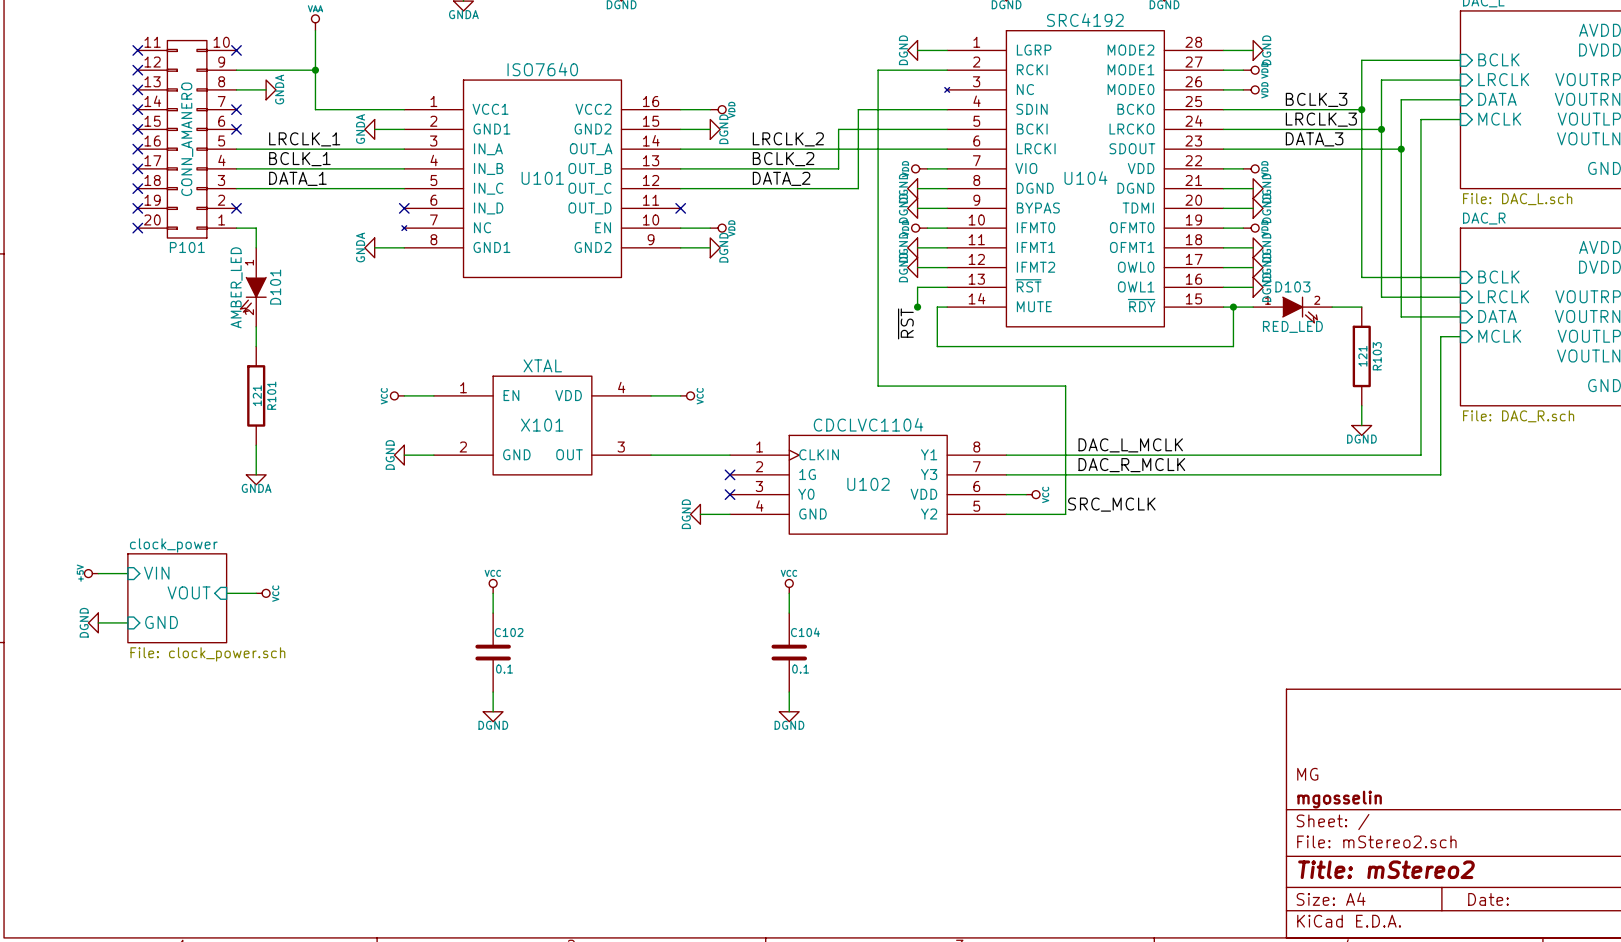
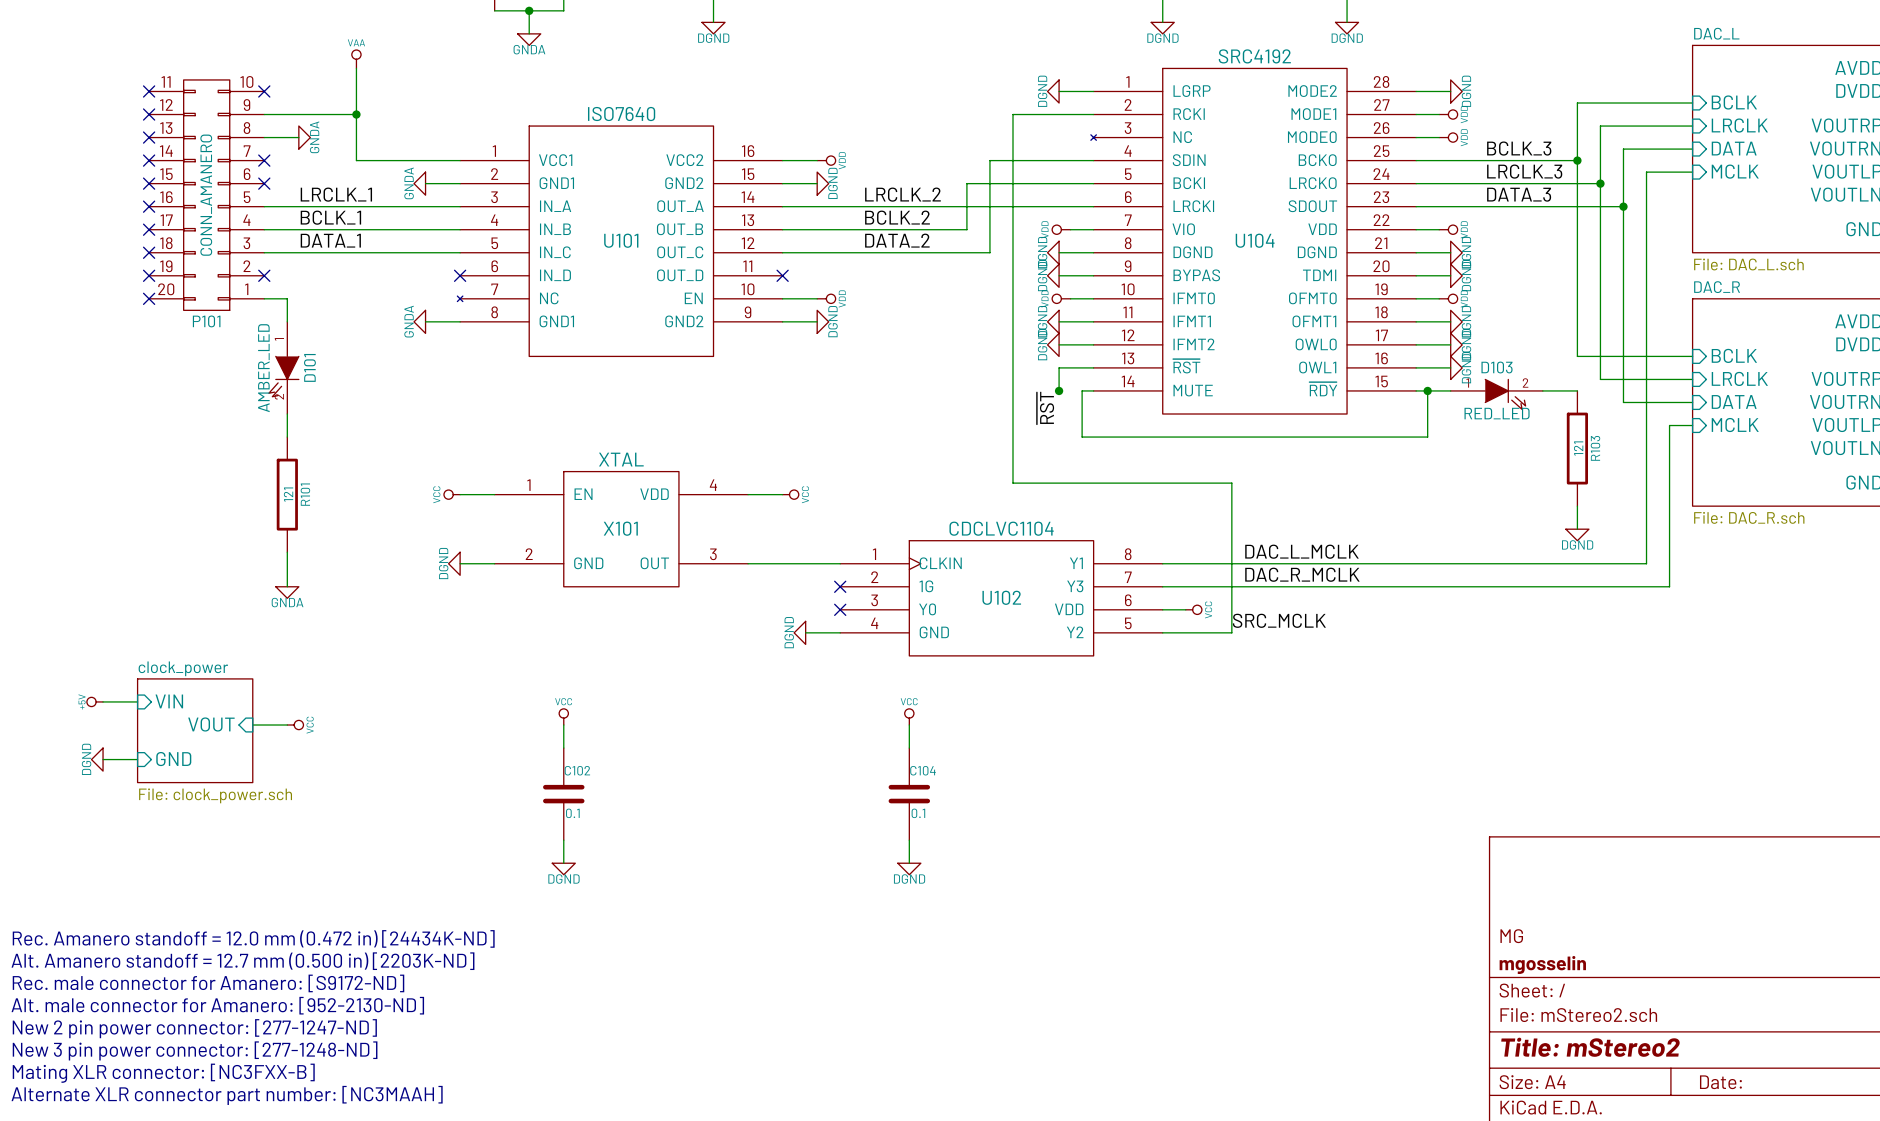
text: none -> Rec. Amanero standoff = 12.0 mm (0.472 in) [24434K-ND] (253, 938)
text: none -> Alt. Amanero standoff = 12.7 mm (0.500 in) [2203K-ND] (242, 961)
text: none -> Rec. male connector for Amanero: [S9172-ND] (208, 983)
text: none -> Alt. male connector for Amanero: [952-2130-ND] (217, 1005)
text: none -> New 2 pin power connector: [277-1247-ND] (194, 1028)
text: none -> New 3 pin power connector: [277-1248-ND] (195, 1050)
text: none -> Mating XLR connector: [NC3FXX-B] (163, 1073)
text: none -> Alternate XLR connector part number: [NC3MAAH] (227, 1095)

